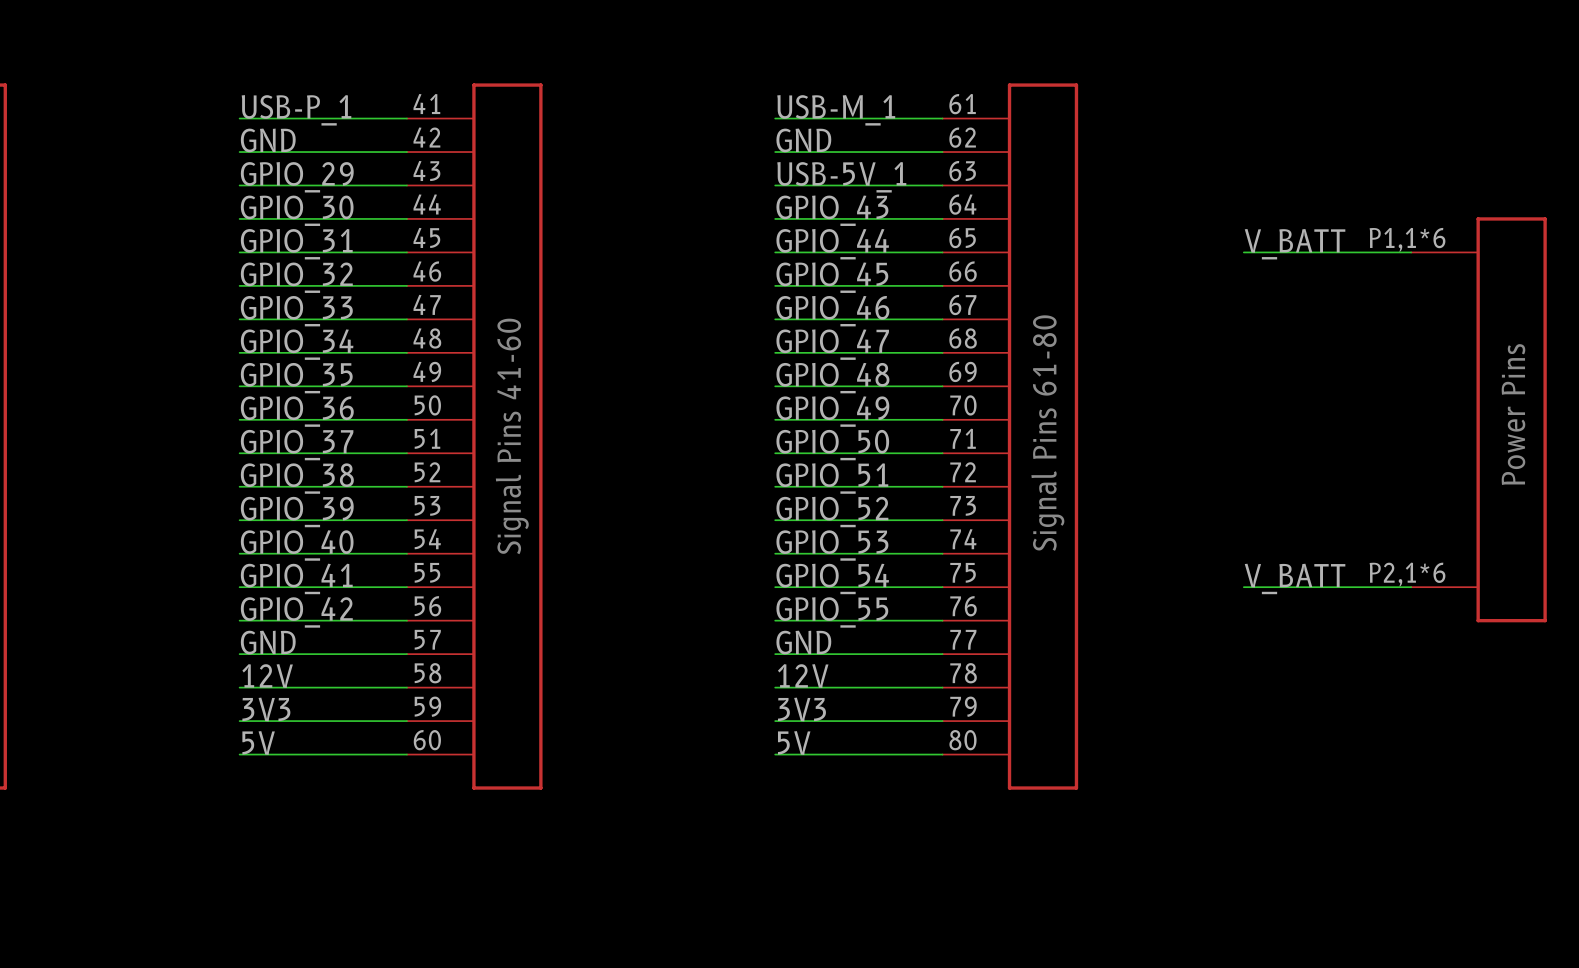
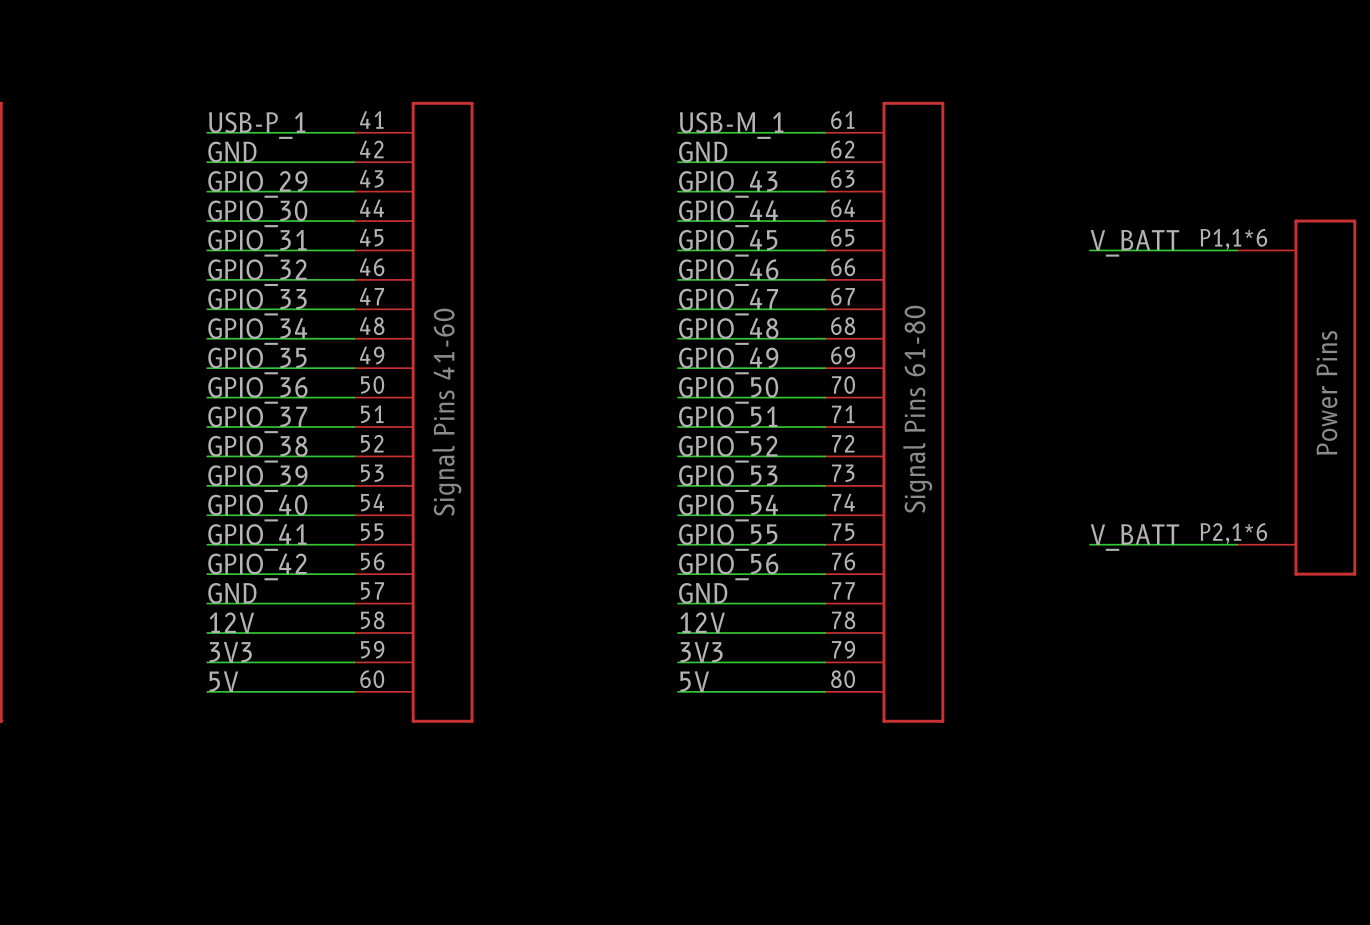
label: USB-5V_1 (841, 177) -> GPIO_43 (728, 184)
label: GPIO_43 (832, 210) -> GPIO_44 (728, 213)
label: GPIO_44 (832, 244) -> GPIO_45 (728, 243)
label: GPIO_45 (832, 277) -> GPIO_46 (728, 272)
label: GPIO_46 (832, 311) -> GPIO_47 (728, 302)
label: GPIO_47 (832, 344) -> GPIO_48 (728, 331)
label: GPIO_48 (832, 378) -> GPIO_49 (728, 360)
label: GPIO_49 (832, 411) -> GPIO_50 (728, 390)
label: GPIO_50 (832, 445) -> GPIO_51 (728, 419)
label: GPIO_51 (832, 478) -> GPIO_52 (728, 449)
label: GPIO_52 (832, 512) -> GPIO_53 (728, 478)
label: GPIO_53 (832, 545) -> GPIO_54 (728, 508)
label: GPIO_54 (832, 578) -> GPIO_55 (728, 537)
label: GPIO_55 (832, 612) -> GPIO_56 (728, 566)

